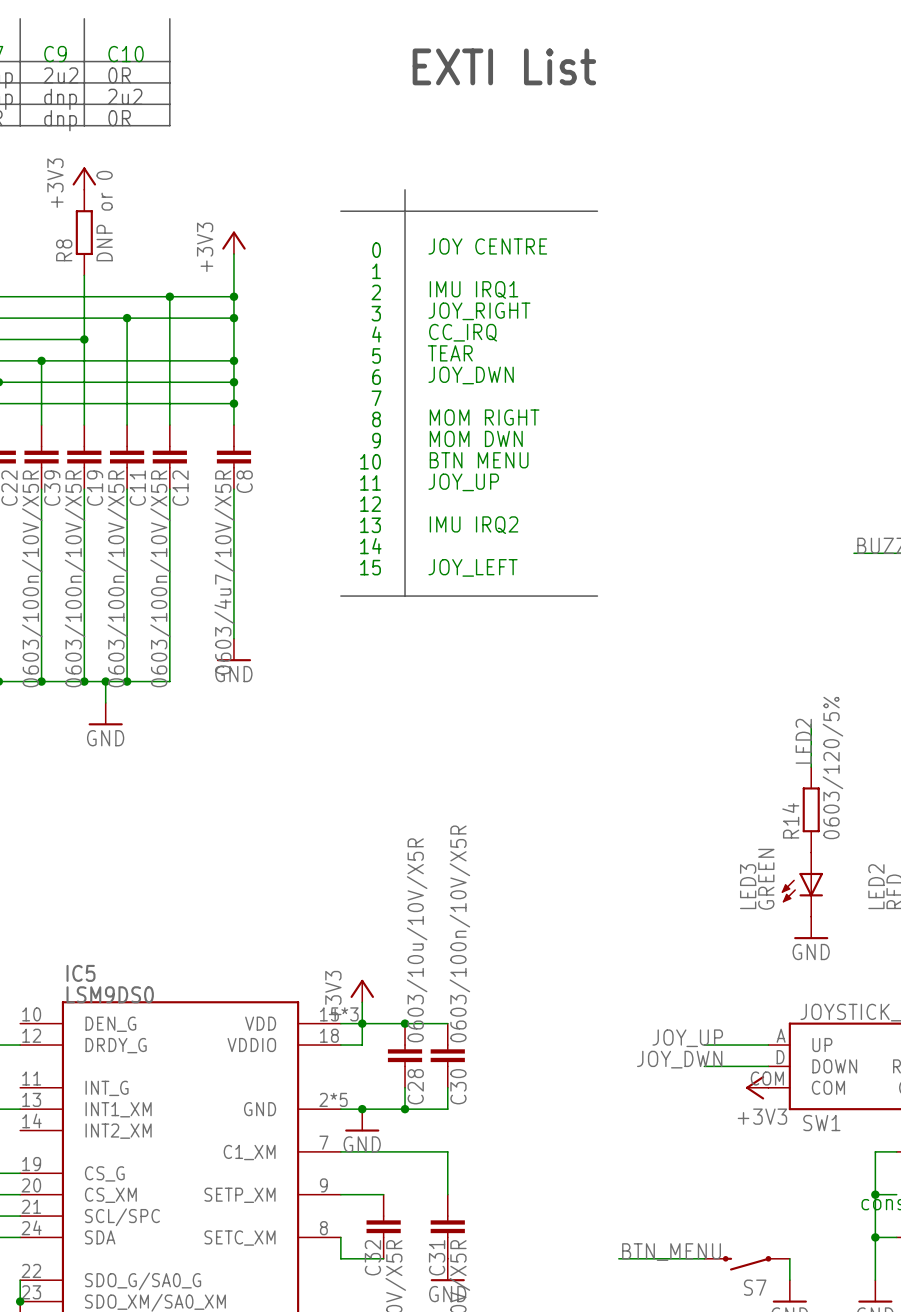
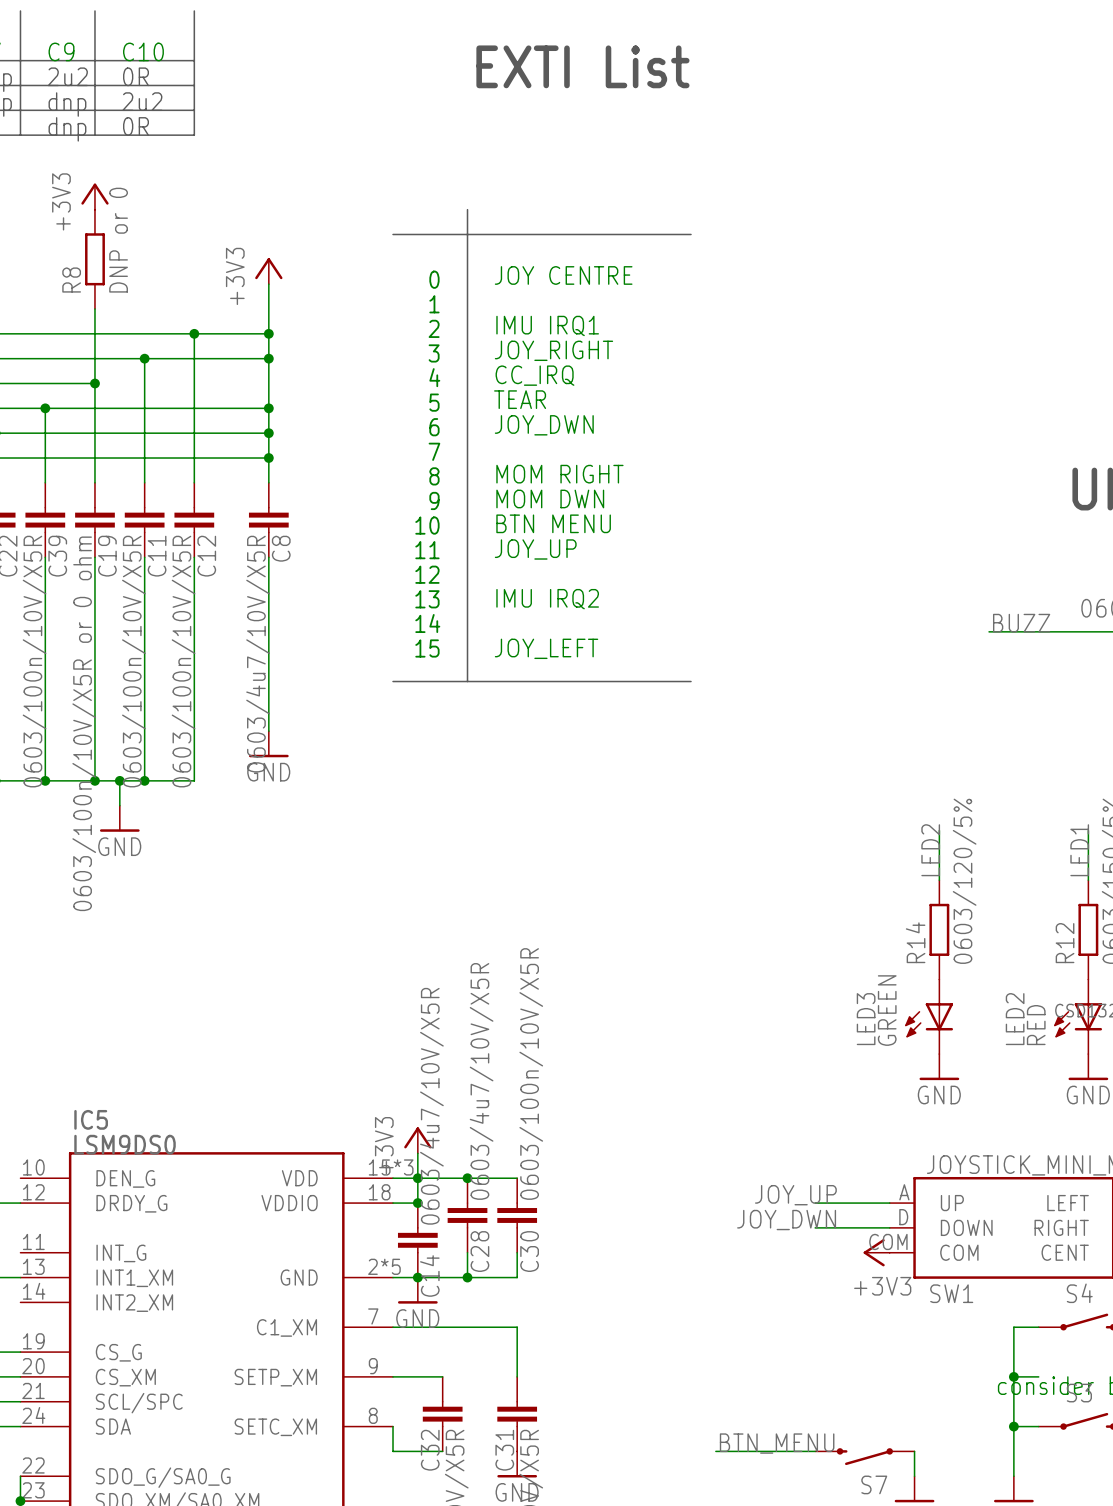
C19 value: 0603/100n/10V/X5R (75, 578) -> 0603/100n/10V/X5R or 0 ohm (84, 723)
C28 value: 0603/10u/10V/X5R (417, 940) -> 0603/4u7/10V/X5R (481, 1081)
junction: none -> (417, 1203)
C14: none -> 0603/4u7/10V/X5R (417, 1240)

